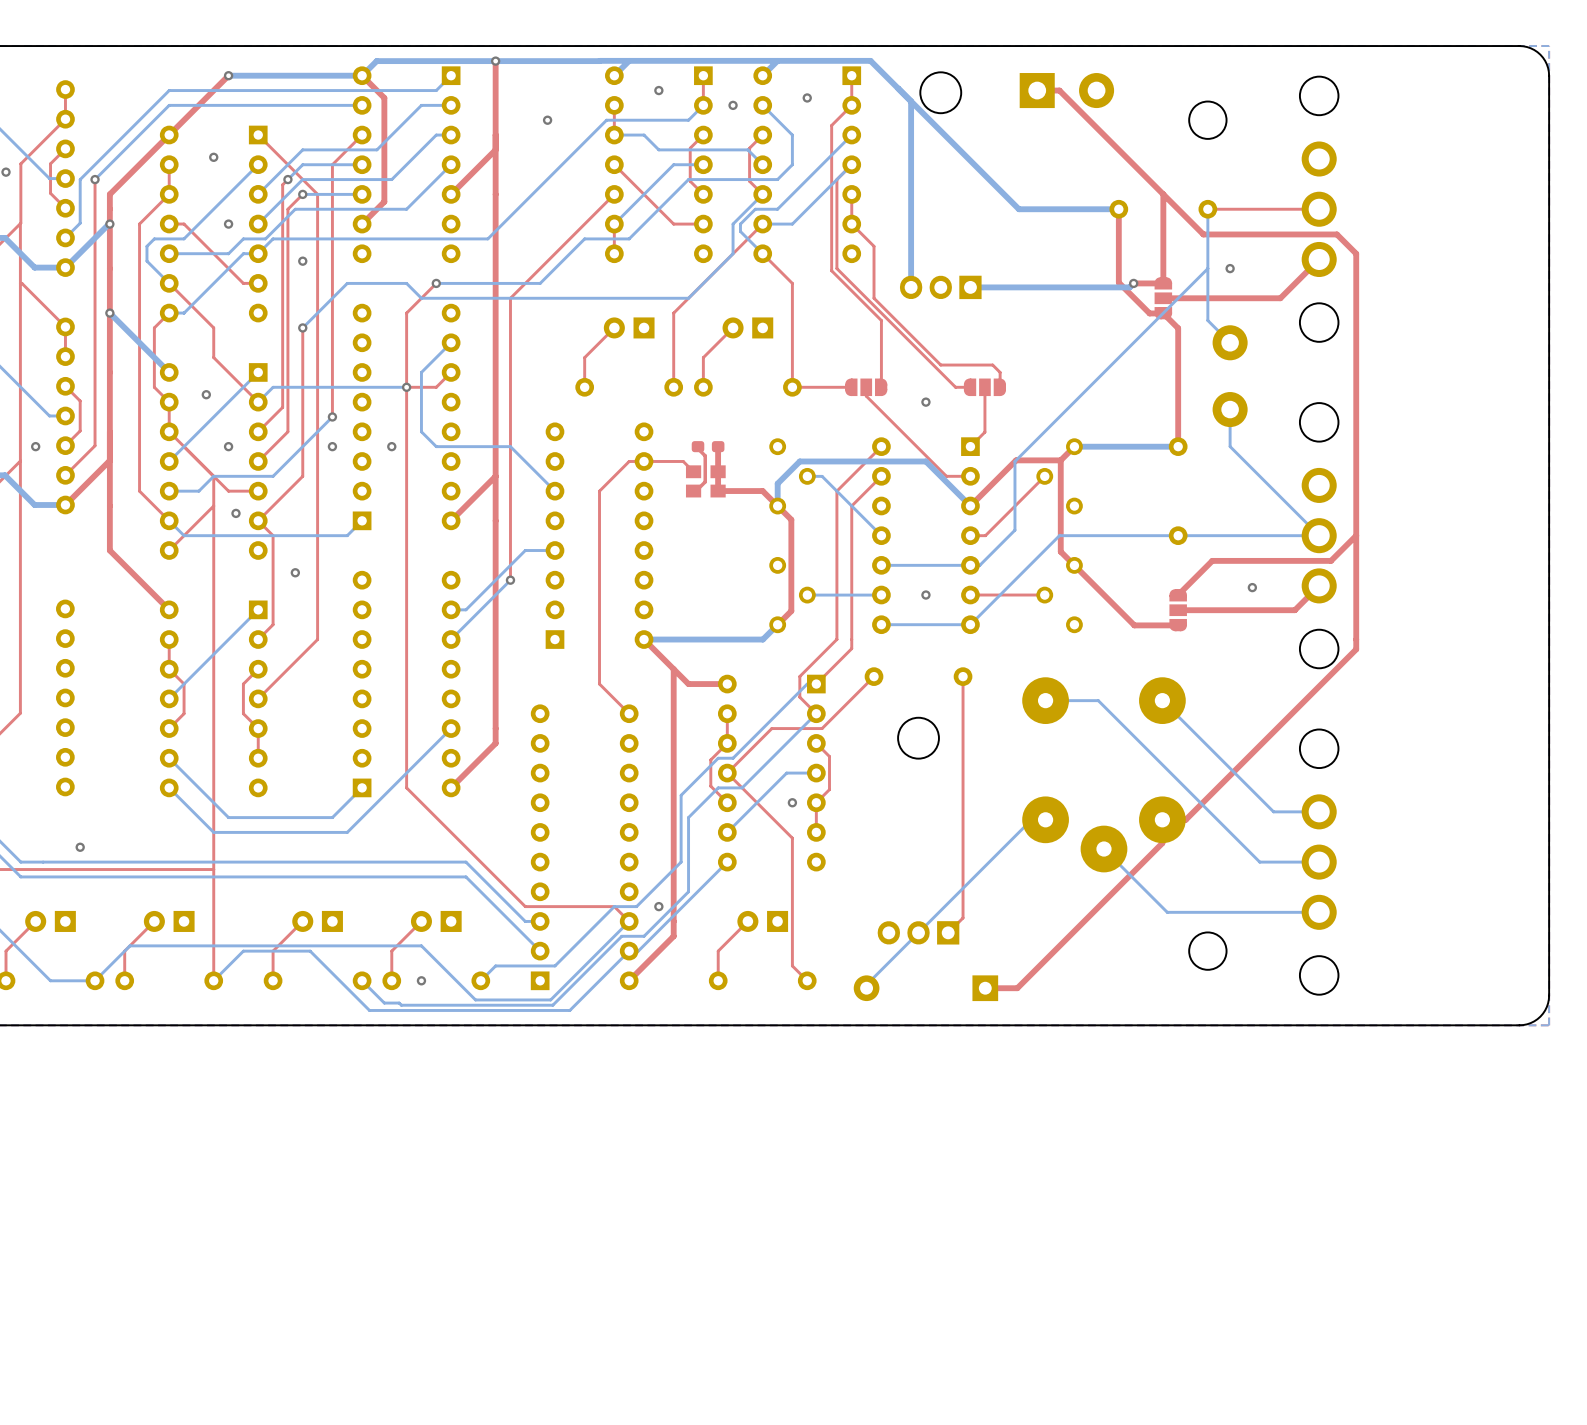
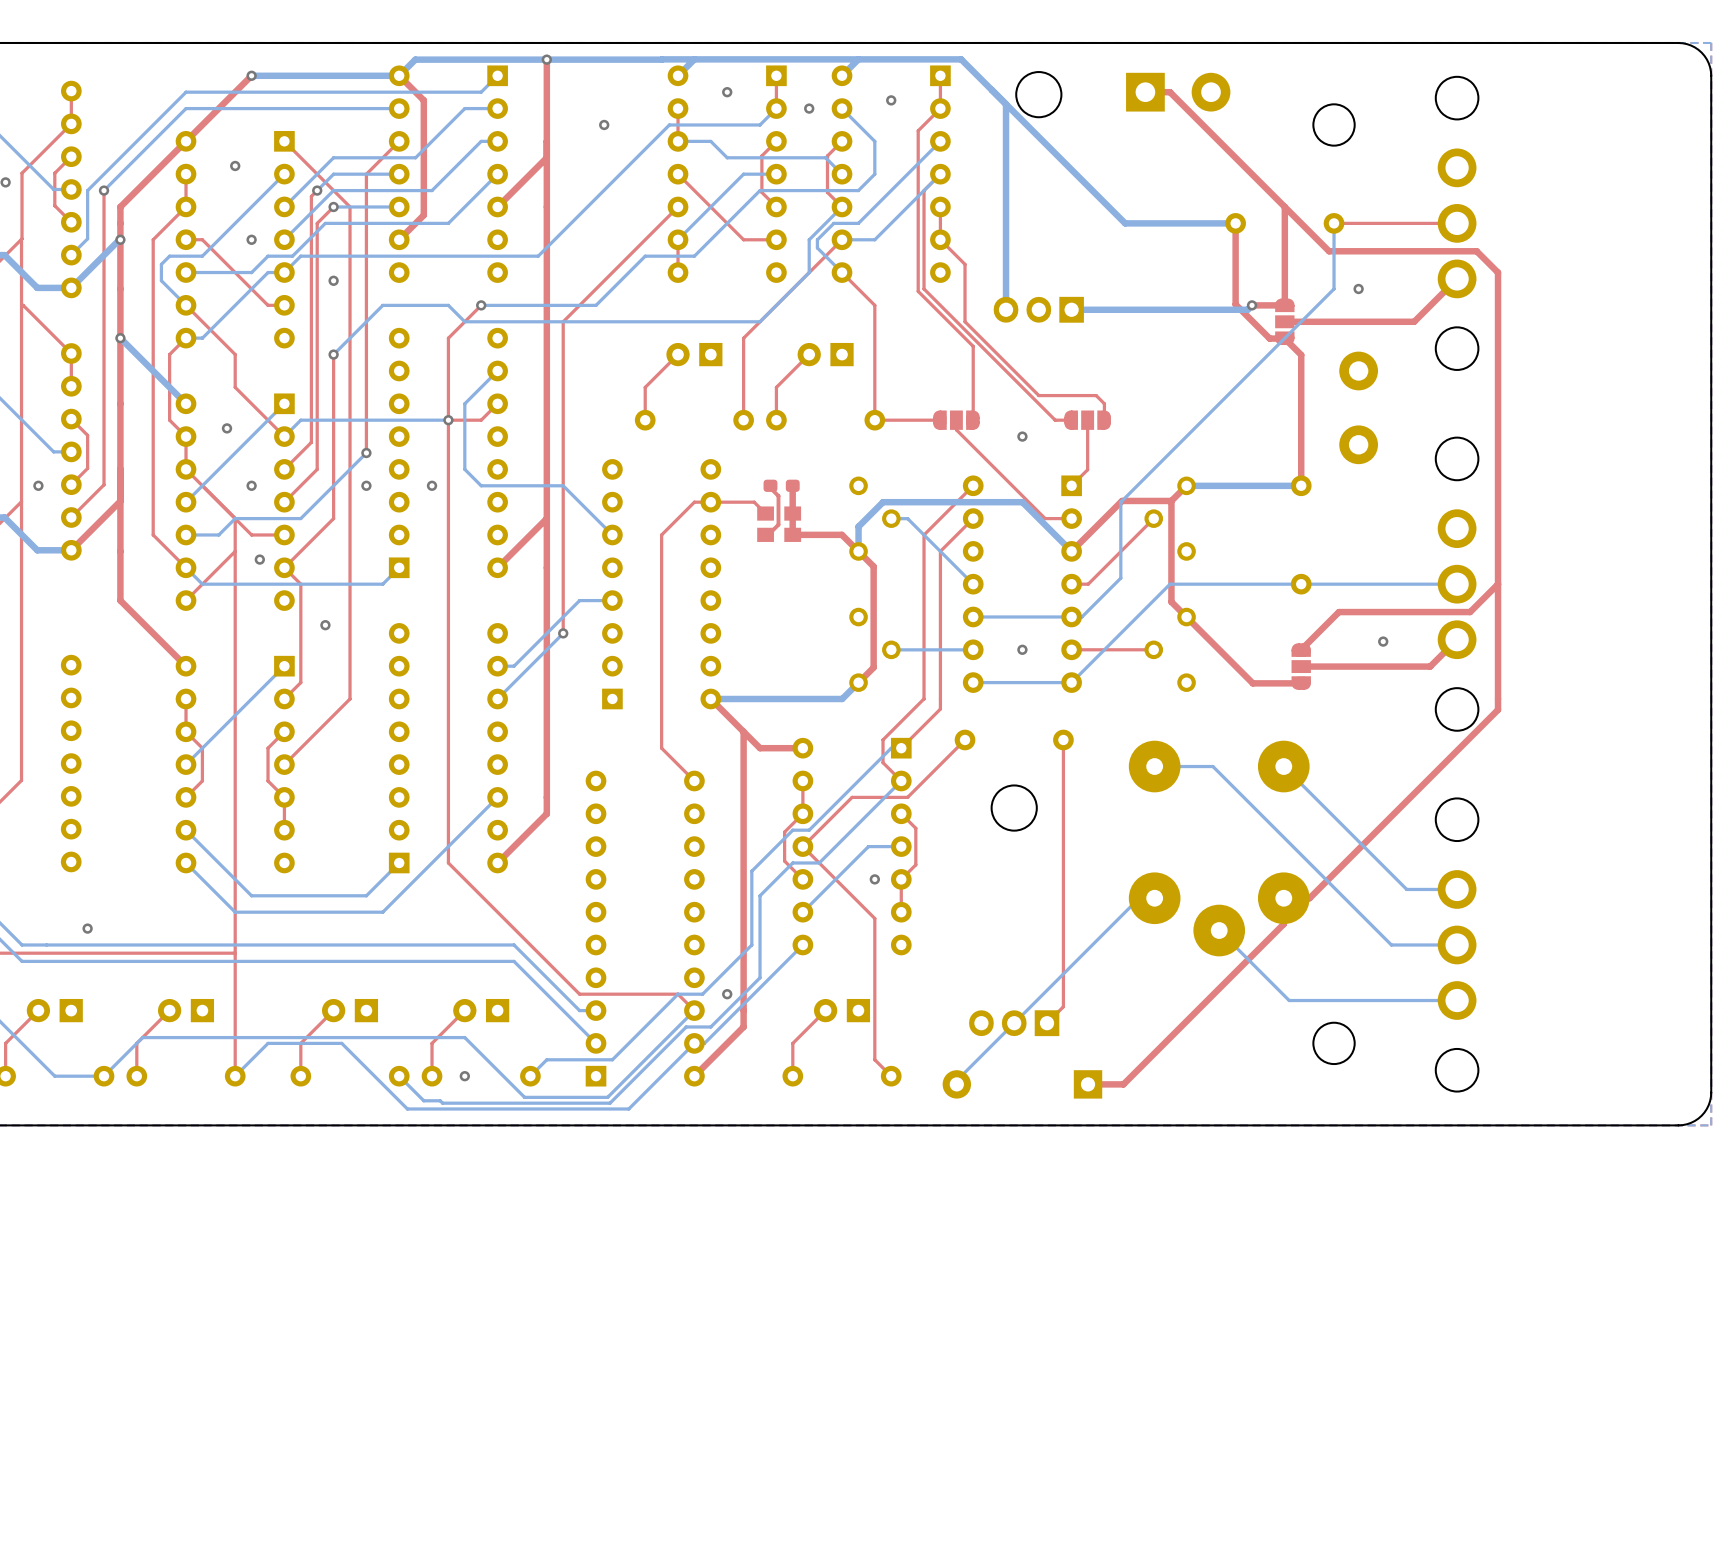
bottom track: (1207, 268) (1207, 320) (1230, 342) -> none
bottom track: (1230, 409) (1230, 446) (1319, 535) -> none

